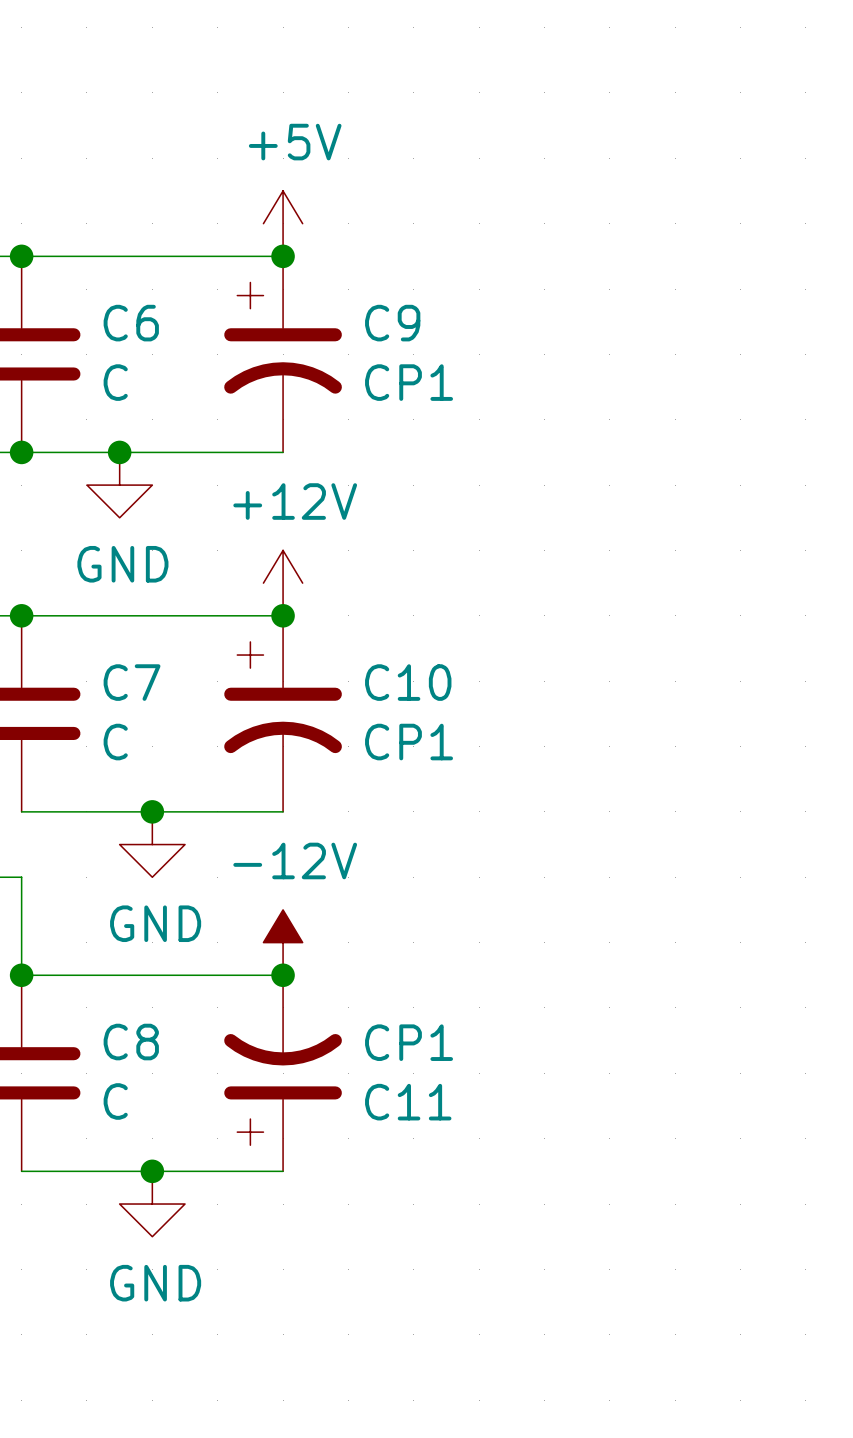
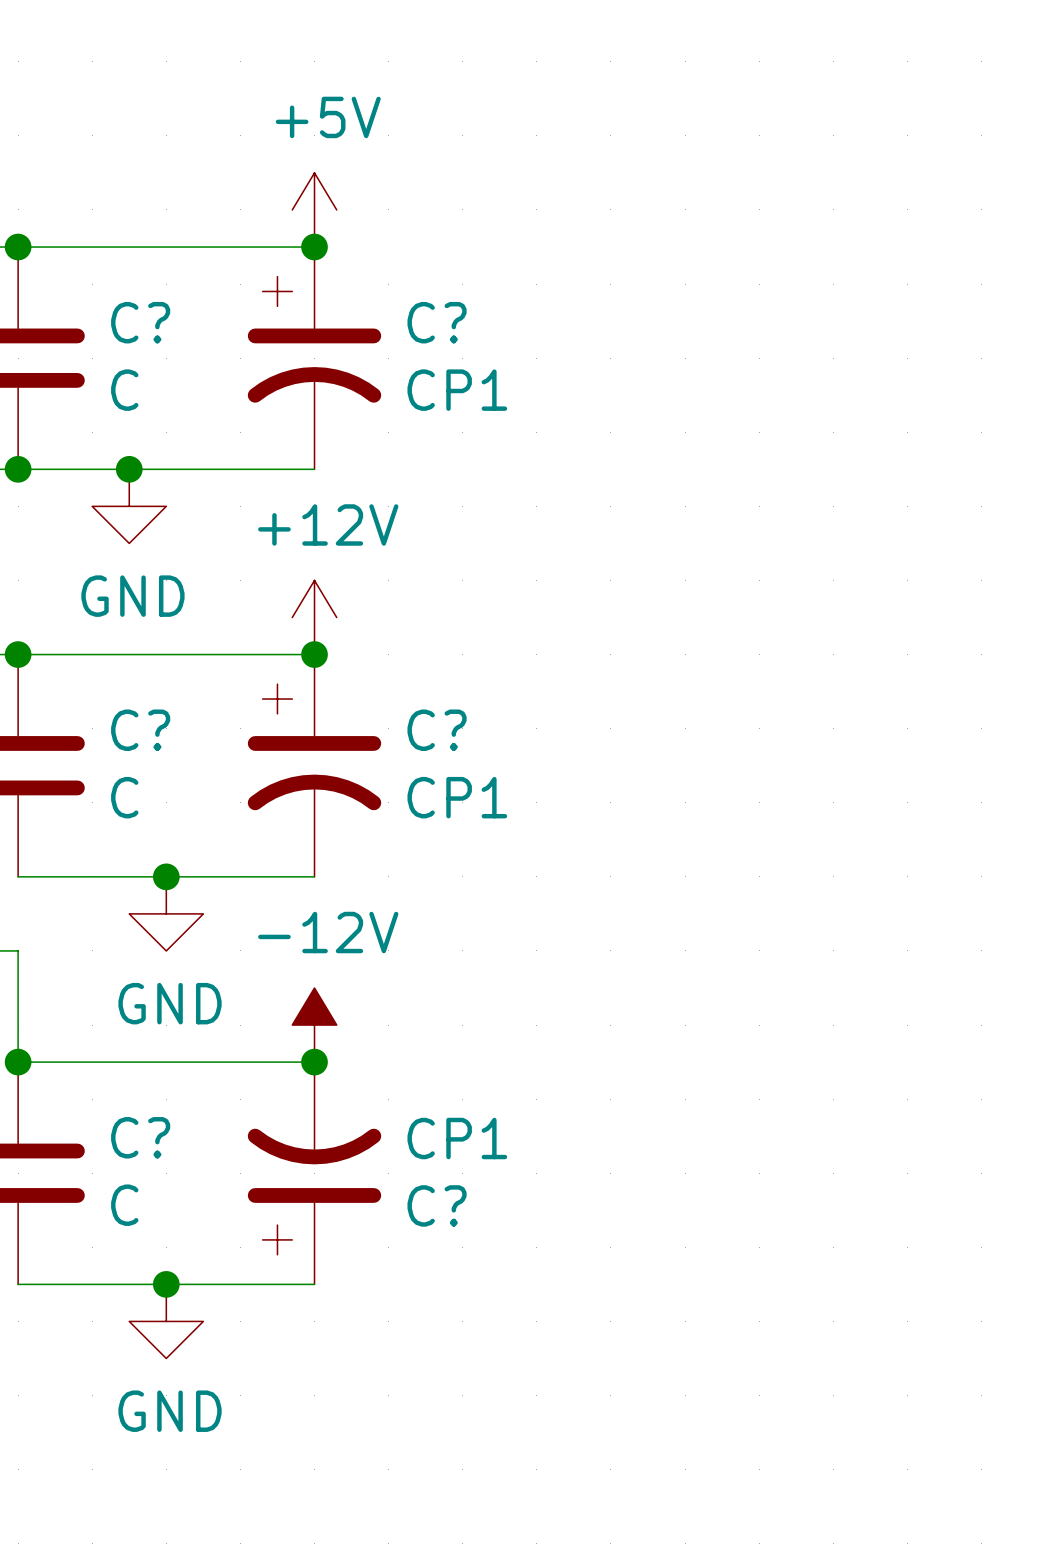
C6 name: C6 (131, 323) -> C? (140, 322)
C9 name: C9 (392, 323) -> C? (437, 322)
C7 name: C7 (132, 682) -> C? (140, 730)
C10 name: C10 (408, 682) -> C? (437, 730)
C8 name: C8 (131, 1042) -> C? (140, 1137)
C11 name: C11 (408, 1102) -> C? (437, 1205)

